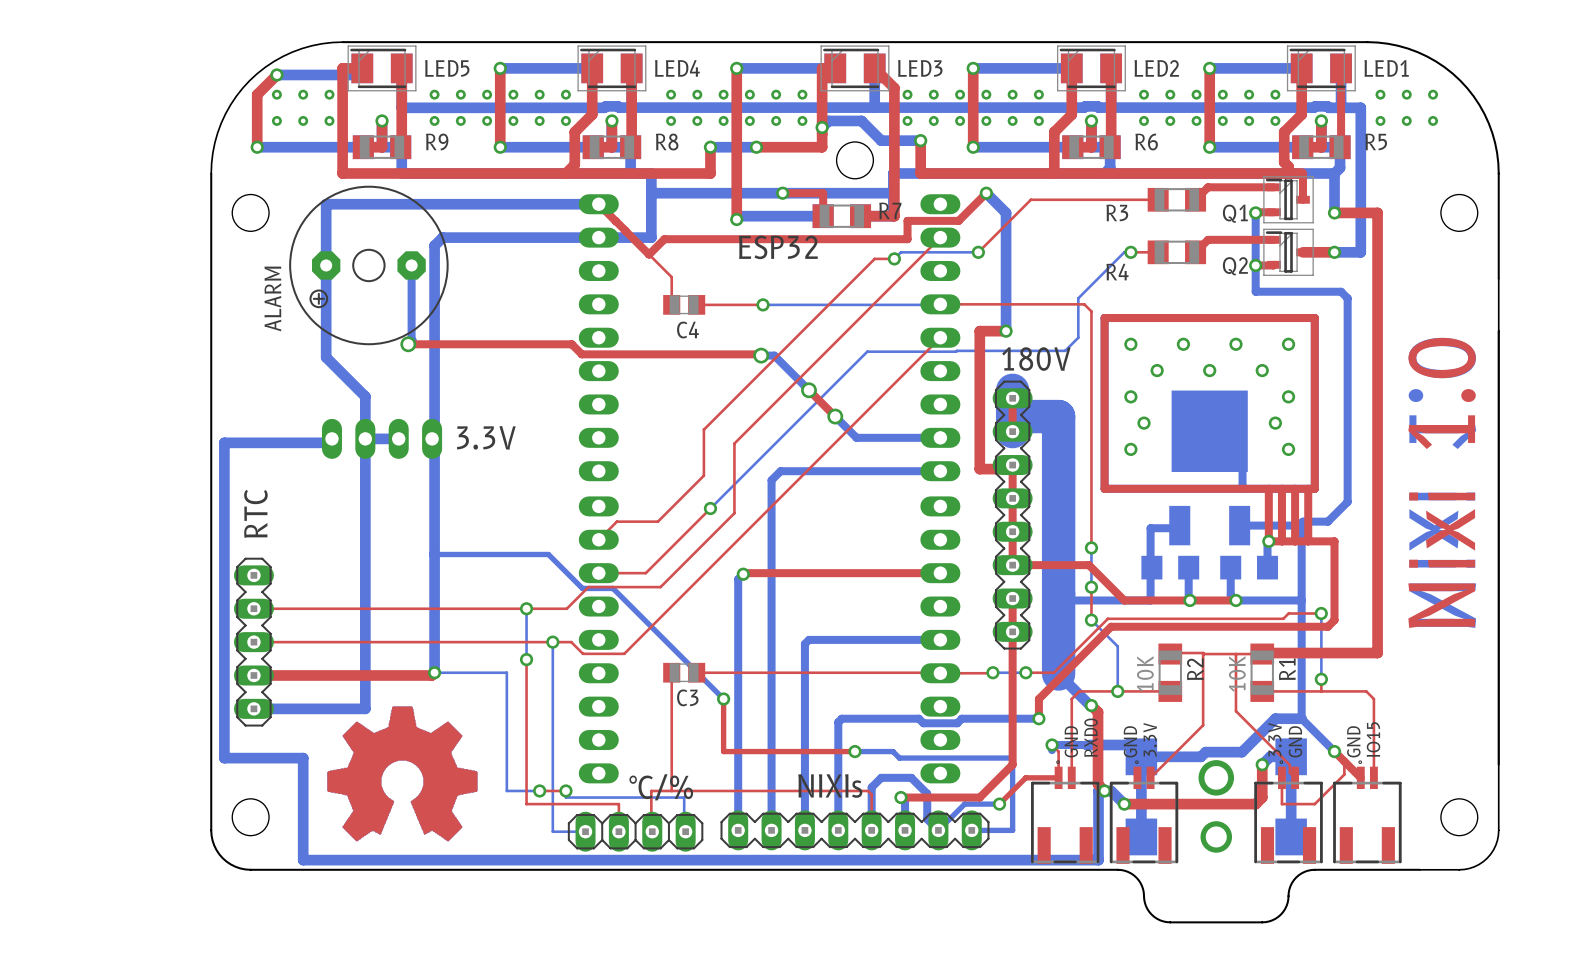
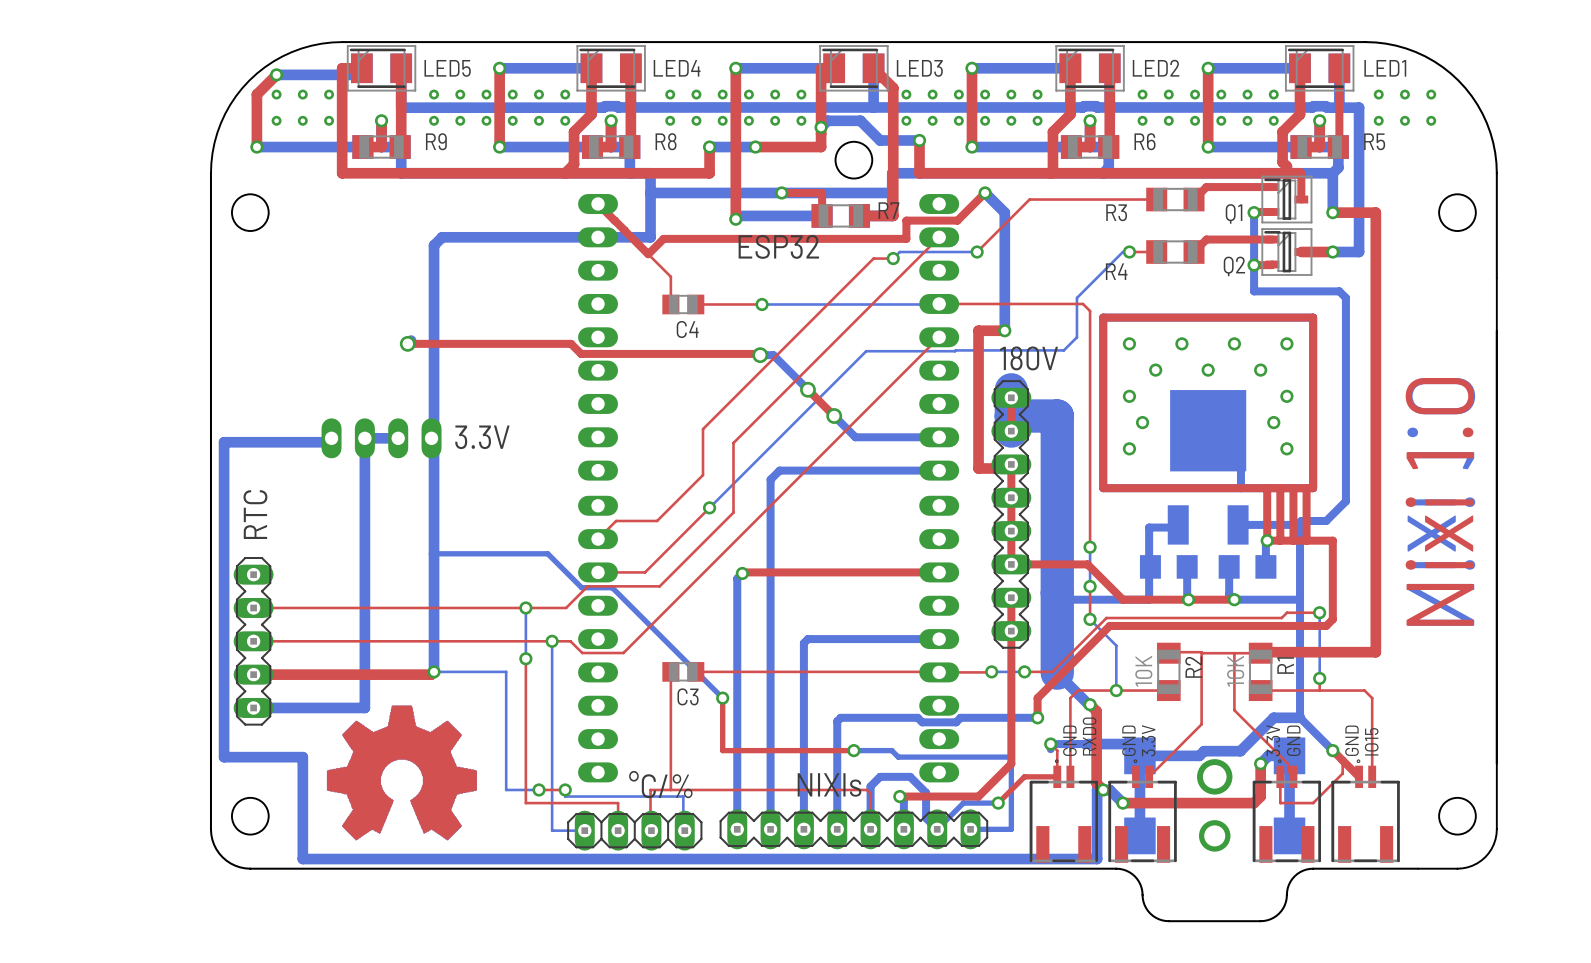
bottom track: (598, 204) (326, 204) (326, 357) (365, 396) (365, 438) -> none
ALARM: (368, 265) -> none
bottom track: (411, 265) (411, 340) -> none

